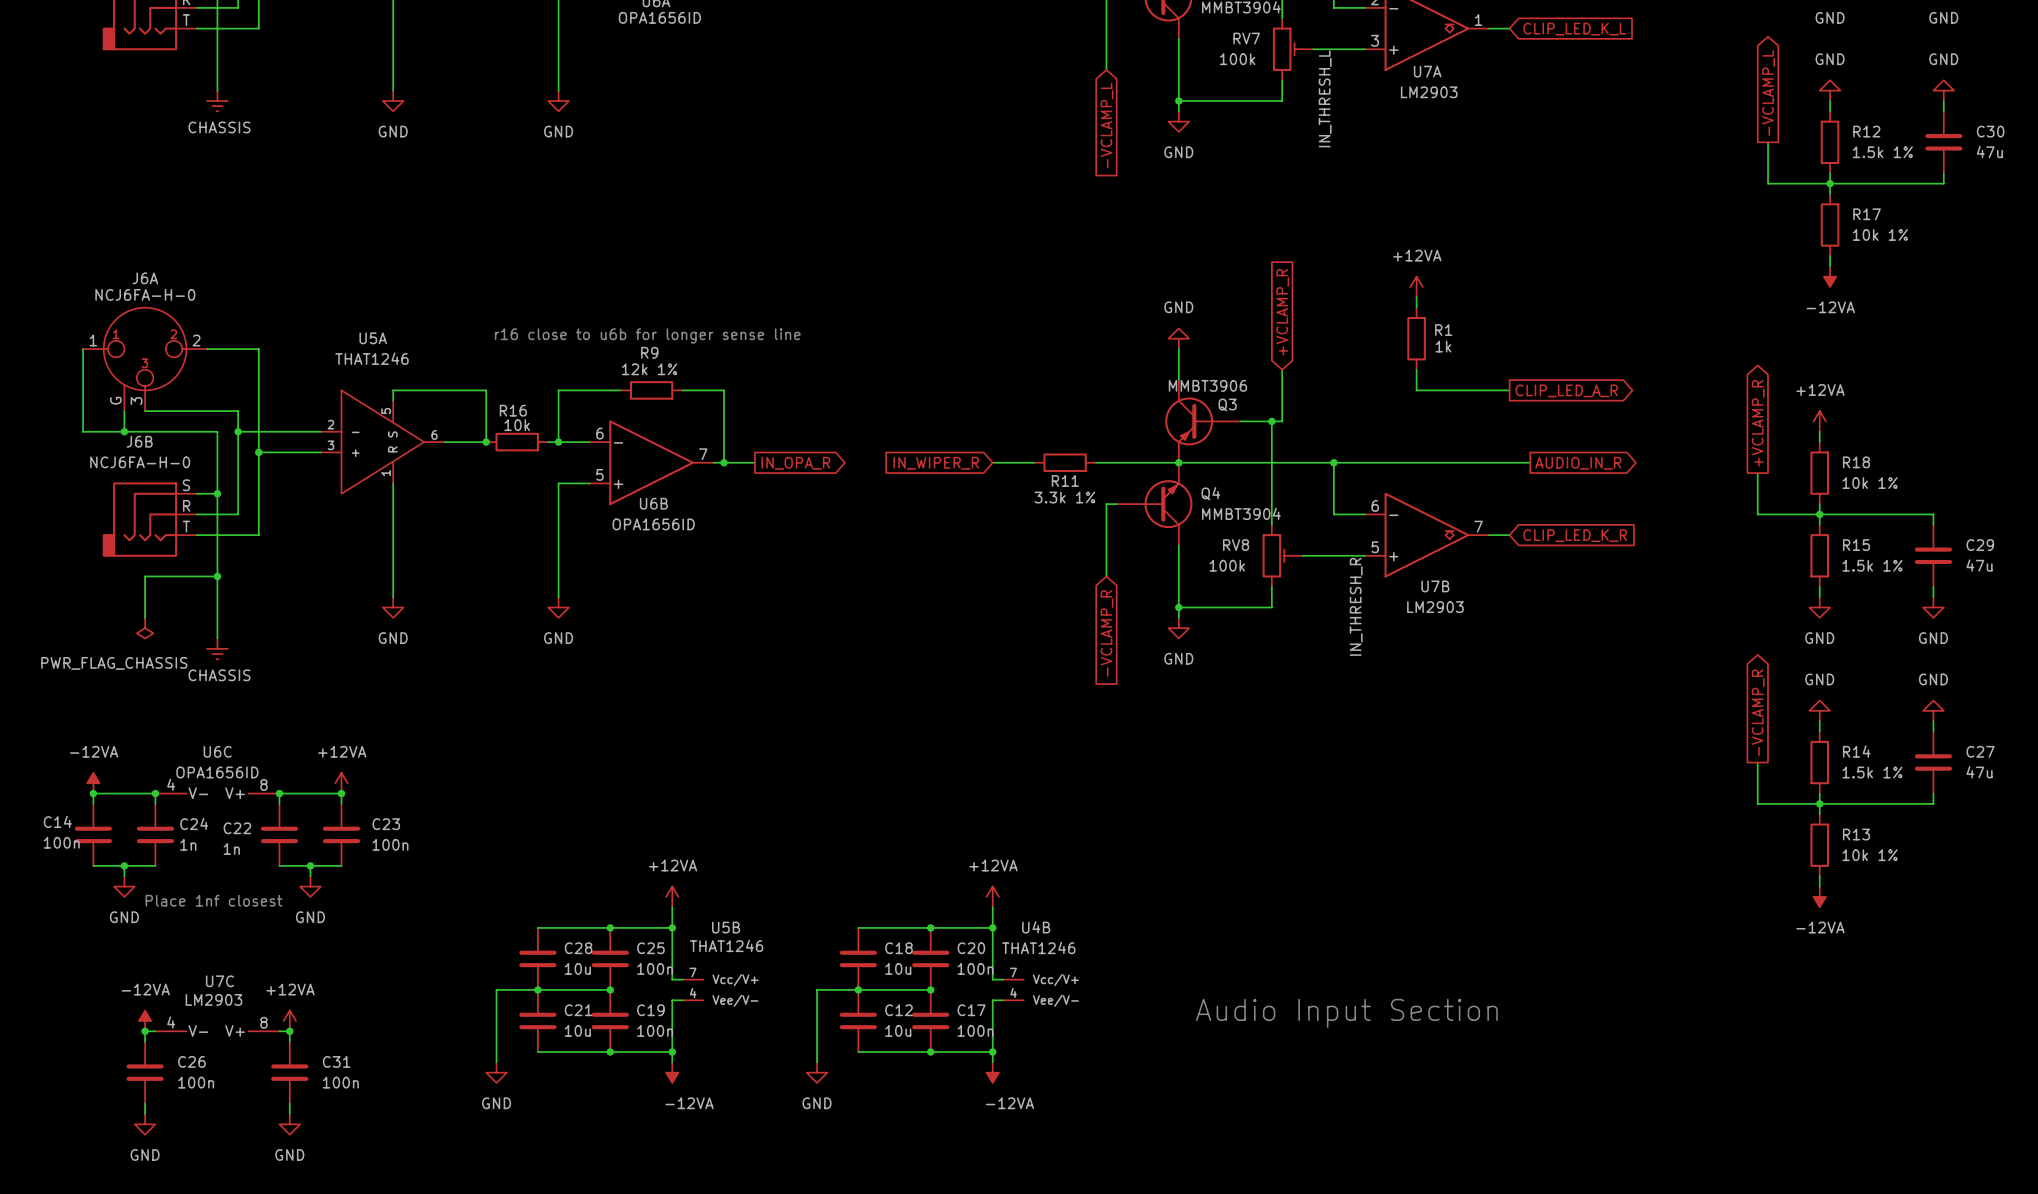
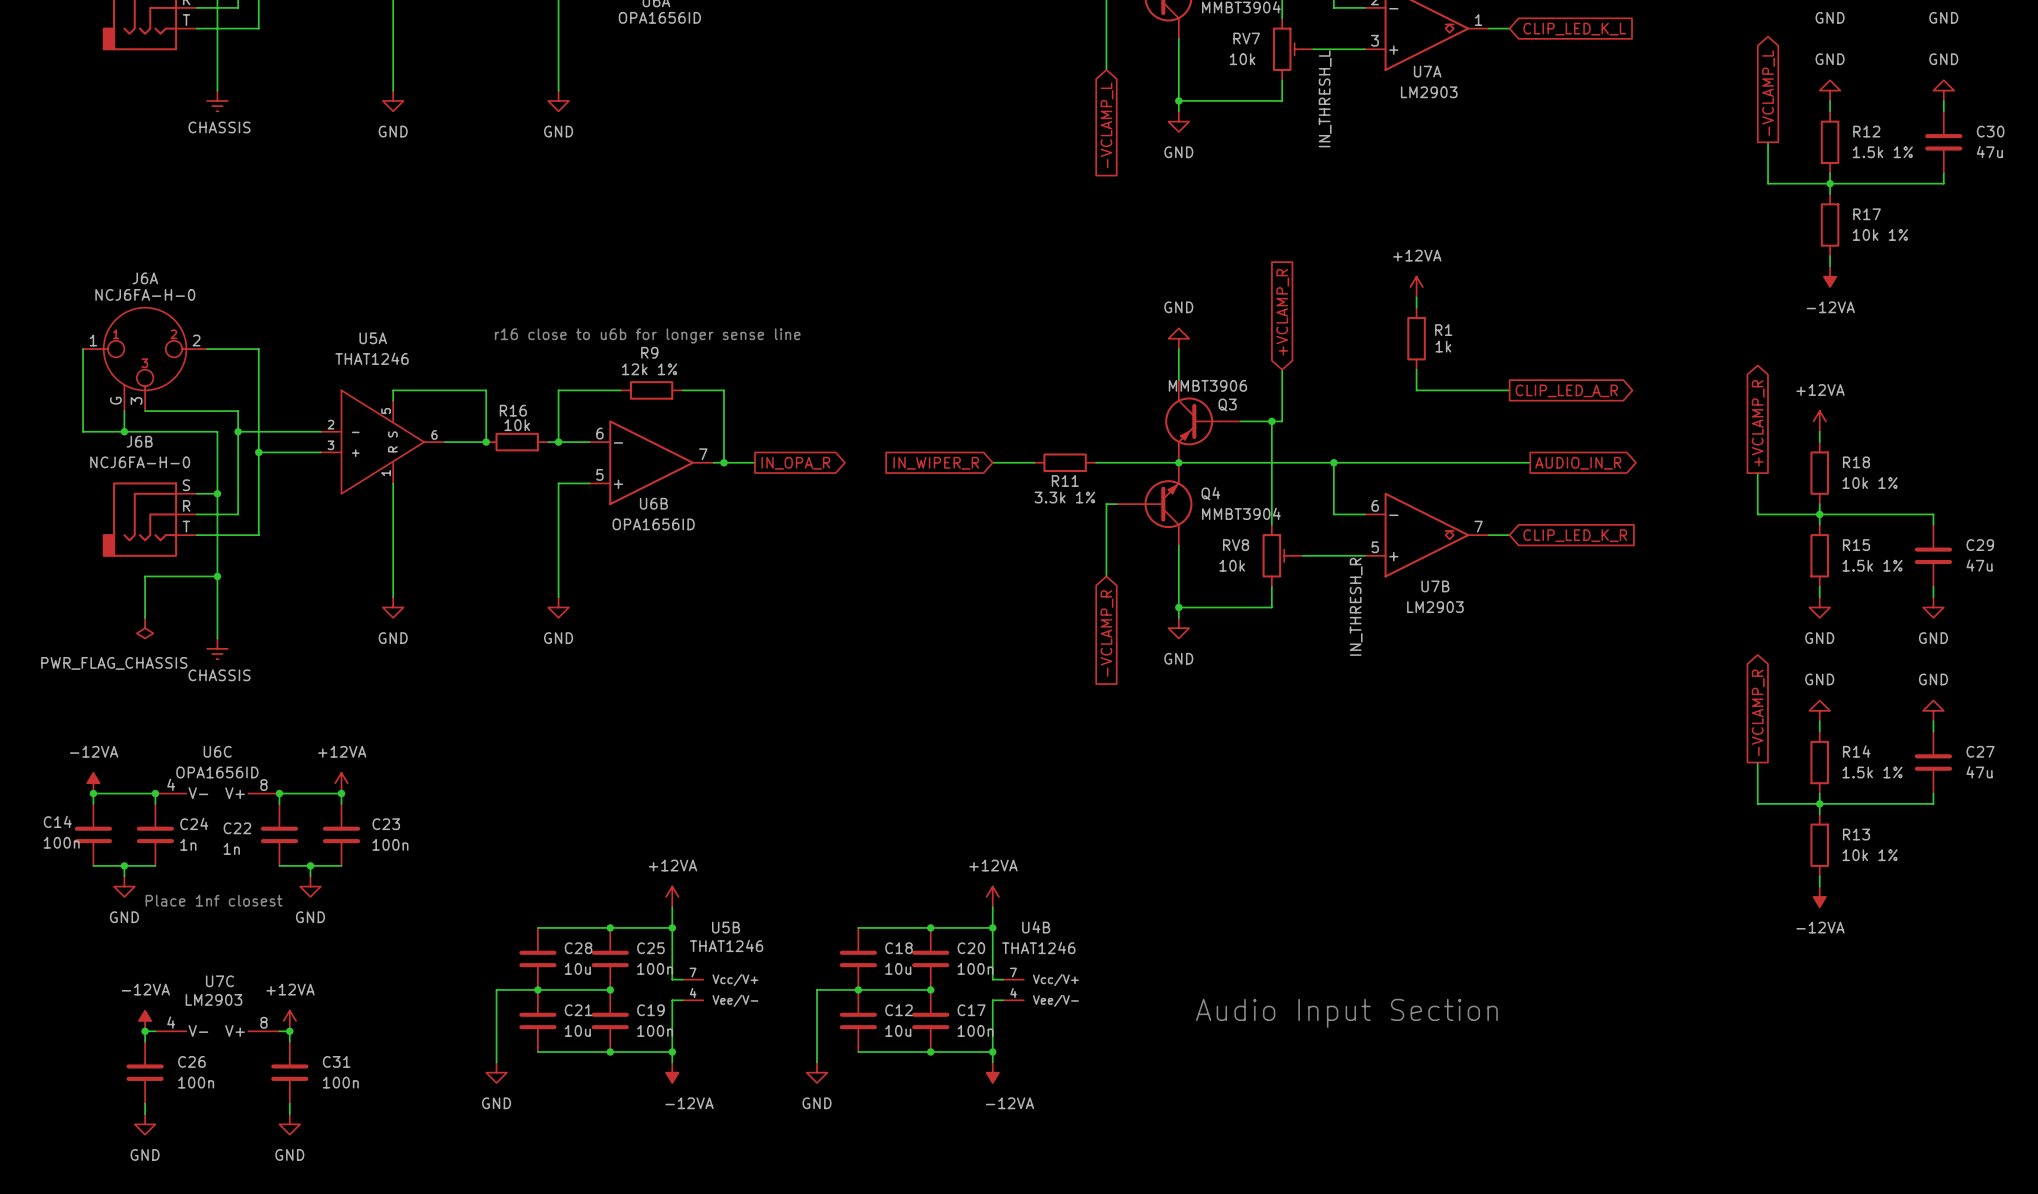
RV7 value: 100k (1237, 59) -> 10k (1242, 59)
RV8 value: 100k (1227, 565) -> 10k (1232, 565)

